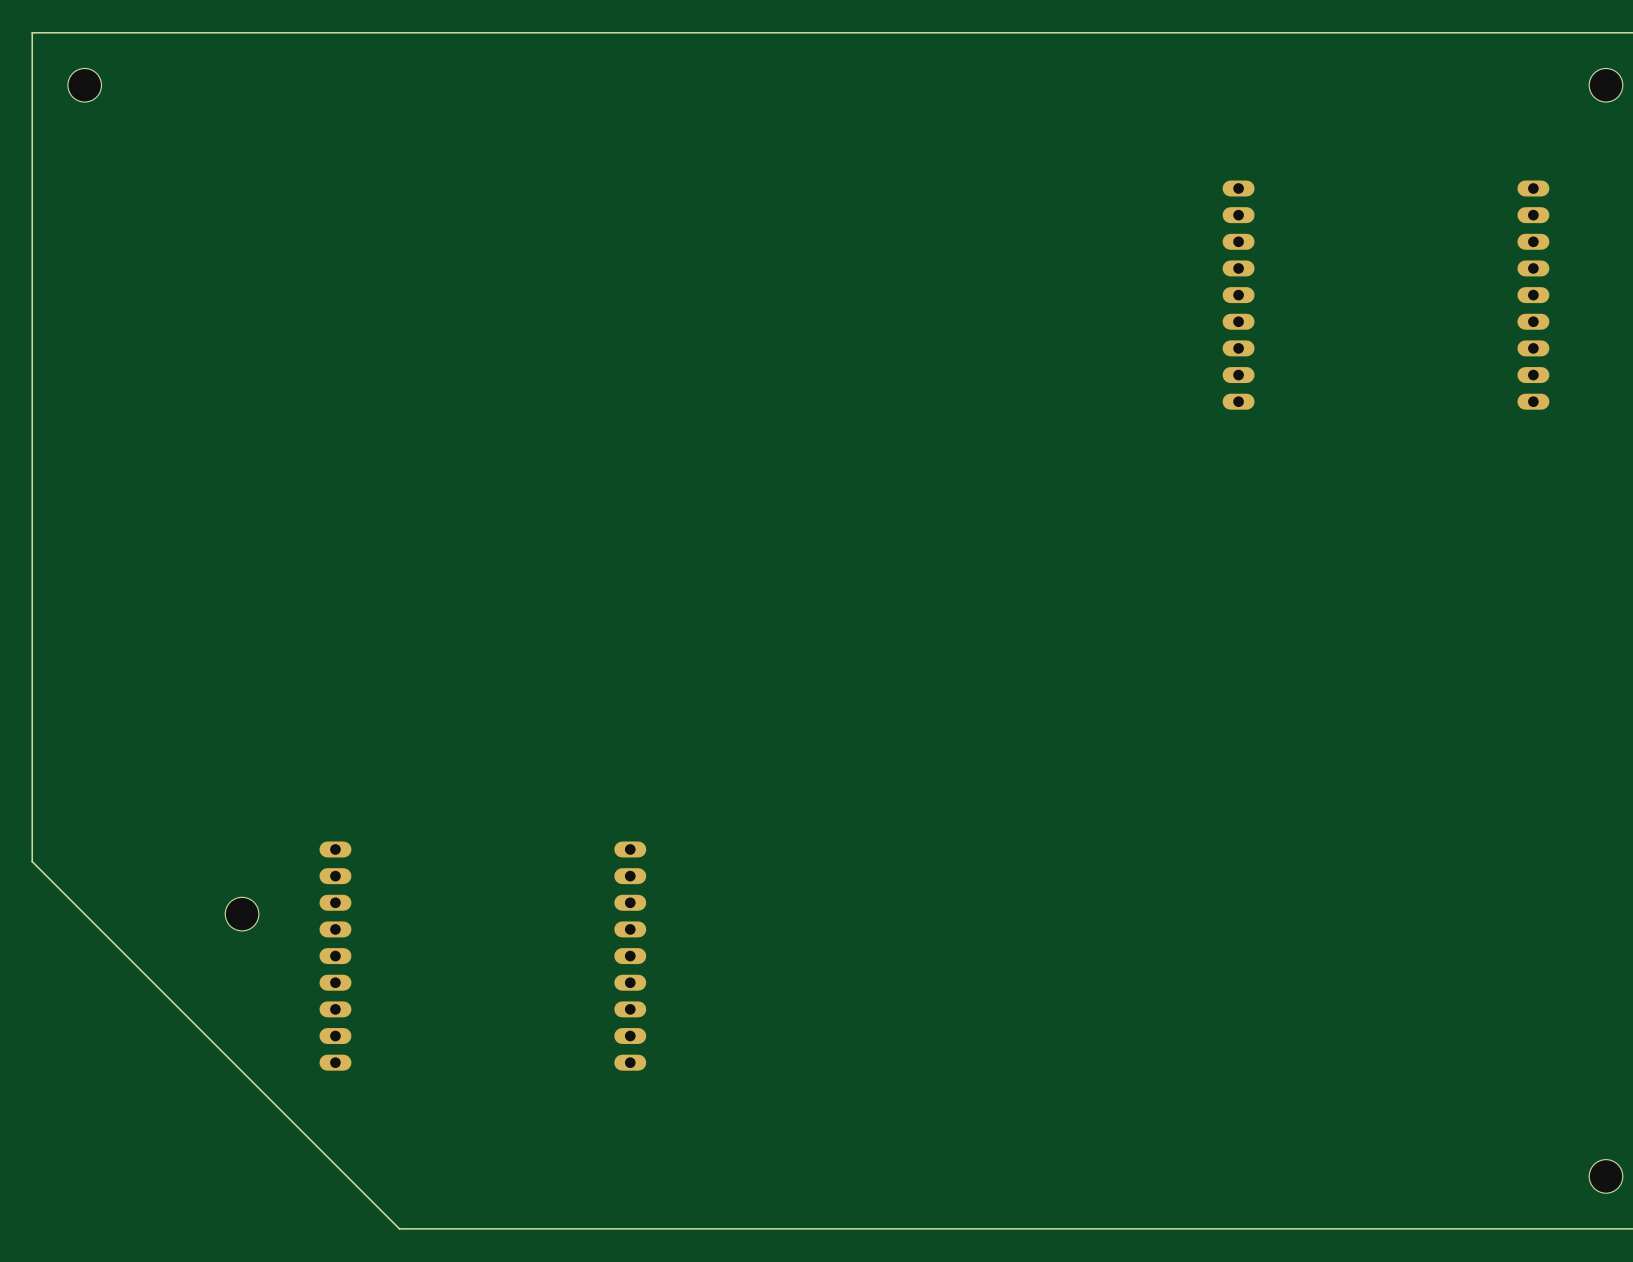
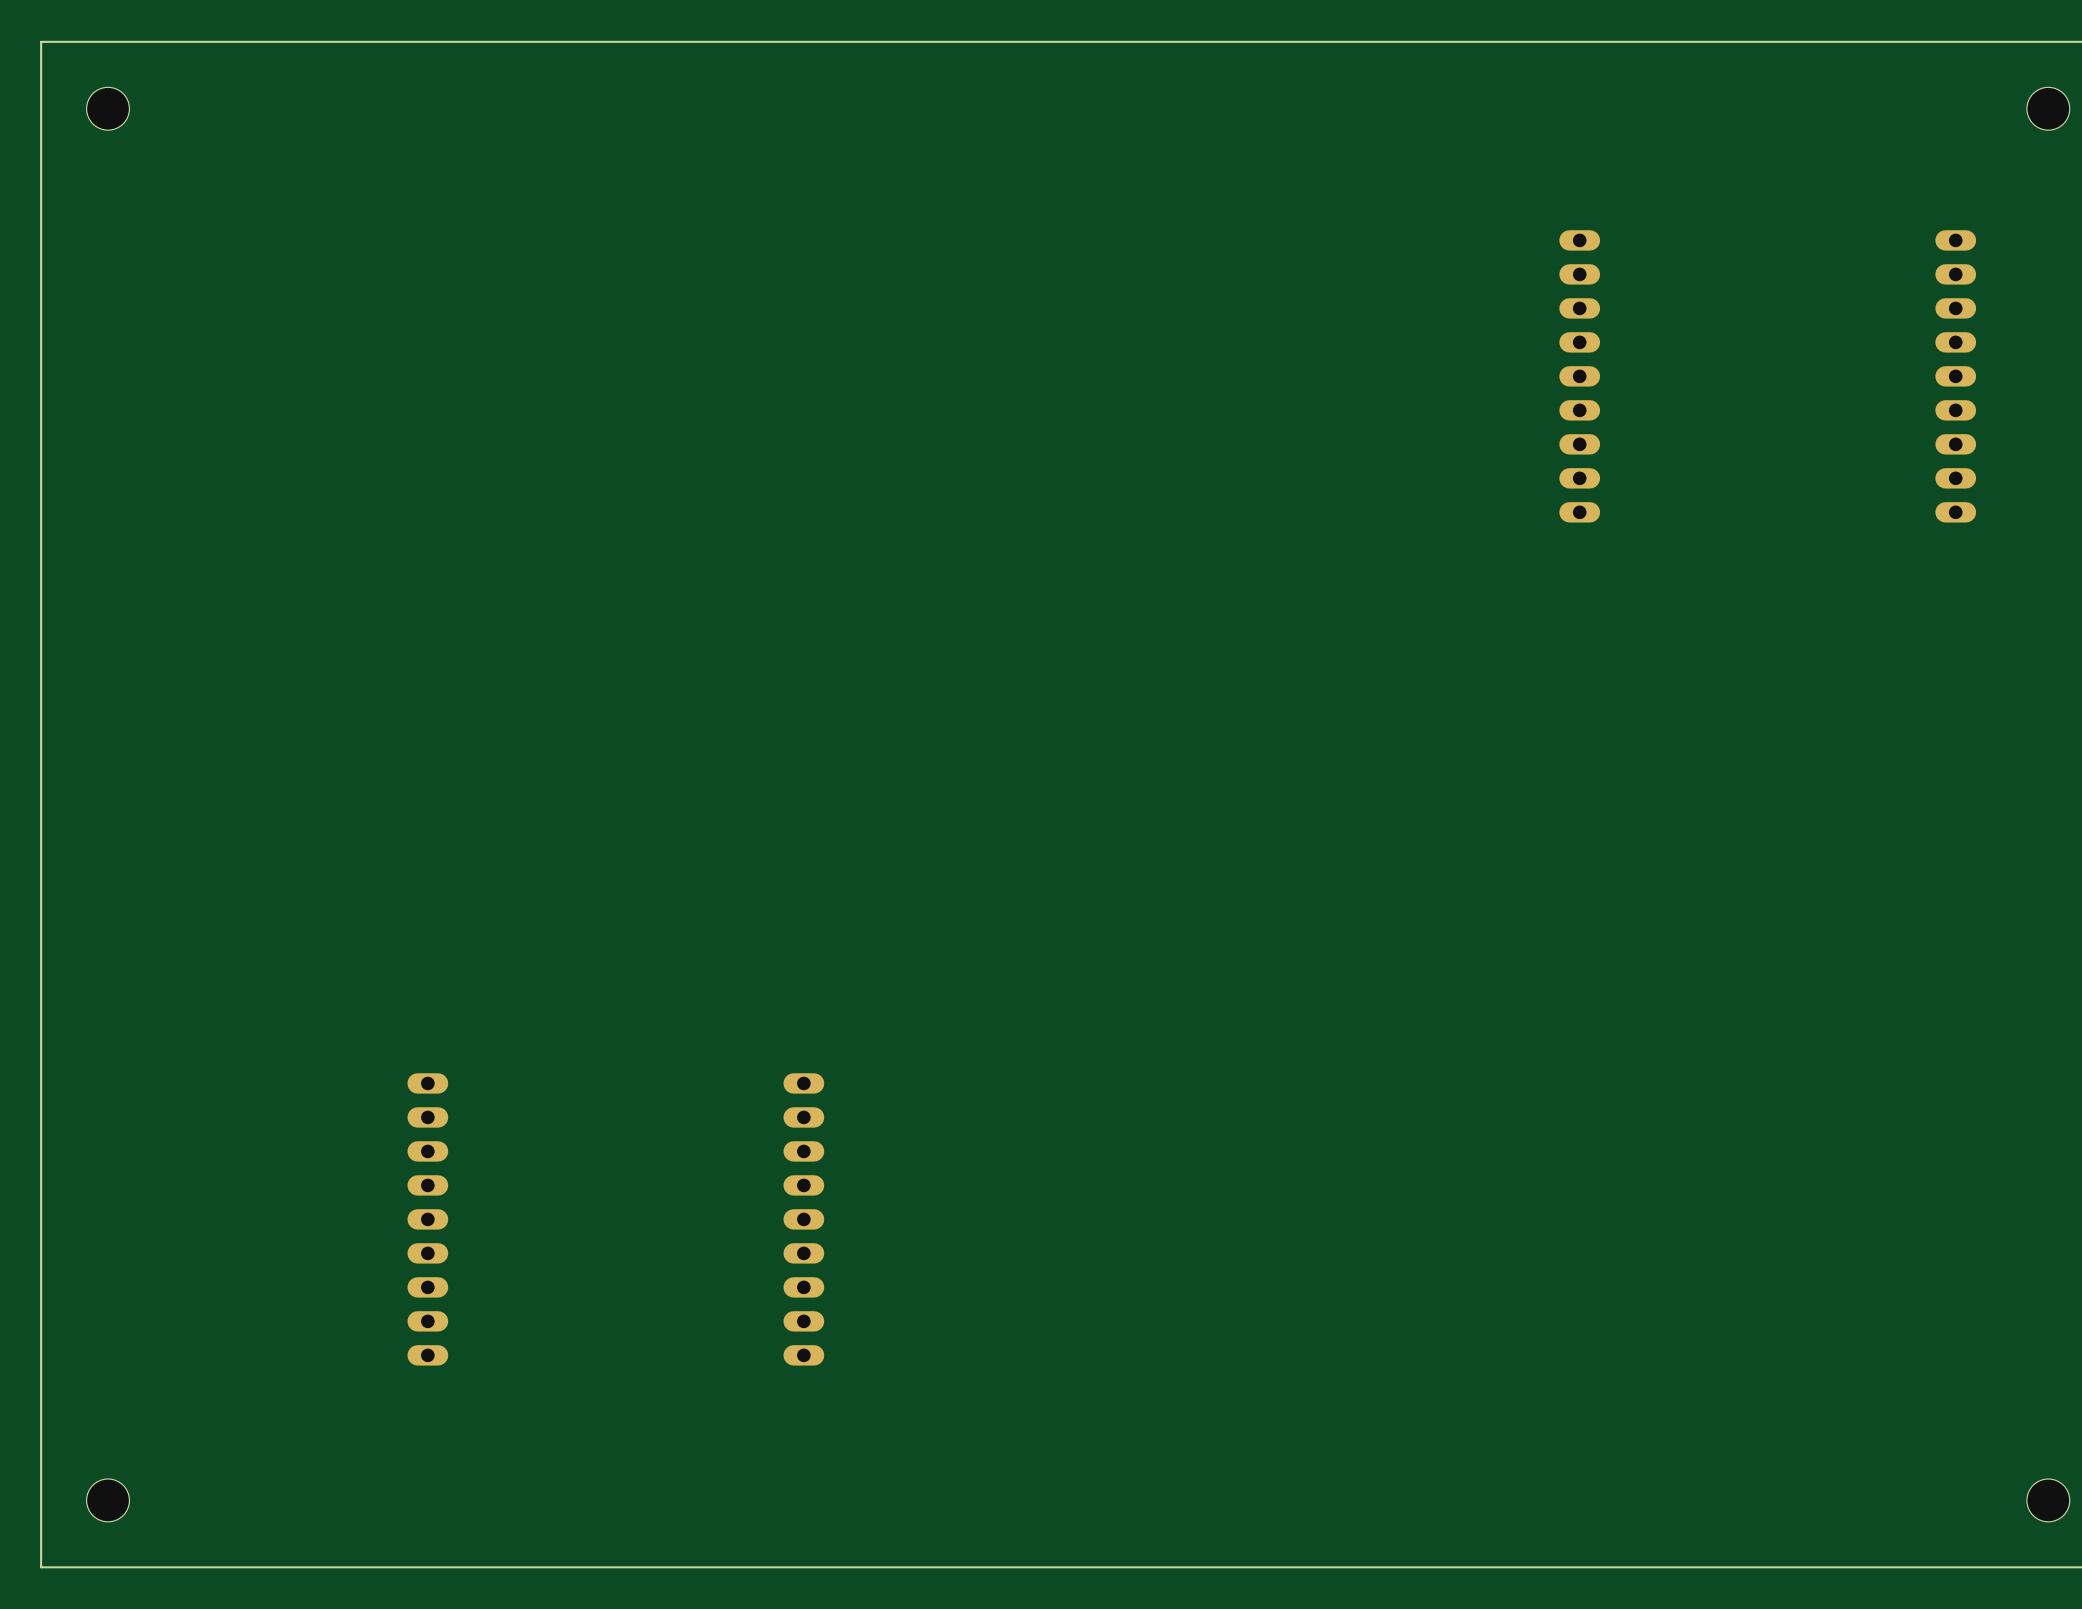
board edge: (32, 861) (399, 1228) -> (41, 1098) (41, 1567) (509, 1567)
hole: (242, 914) -> none
hole: none -> (108, 1500)

